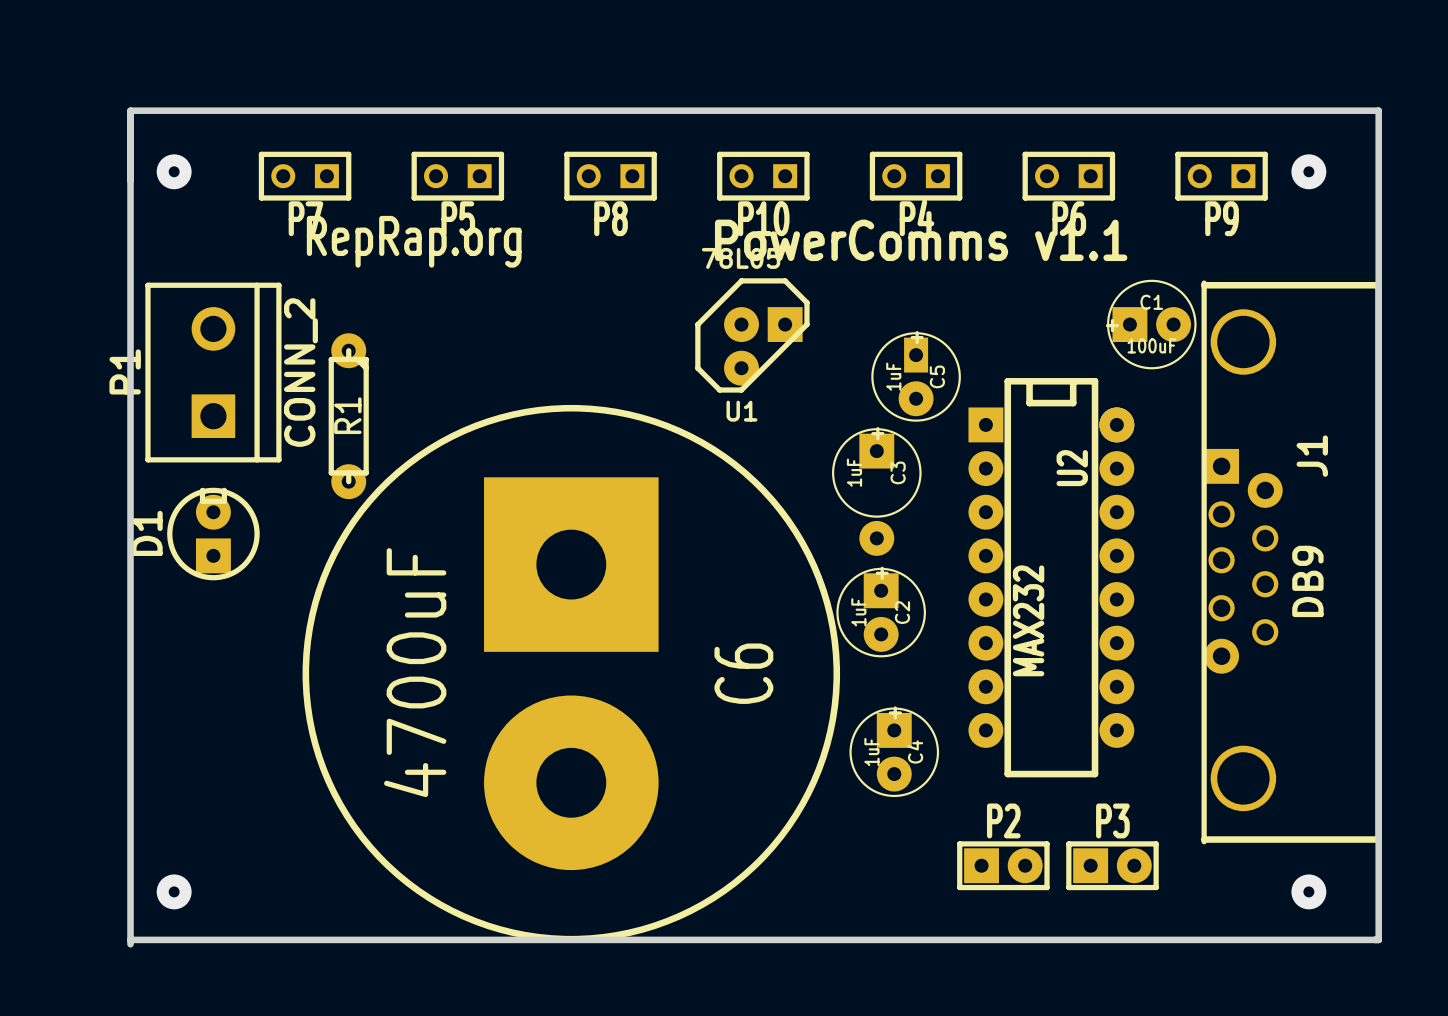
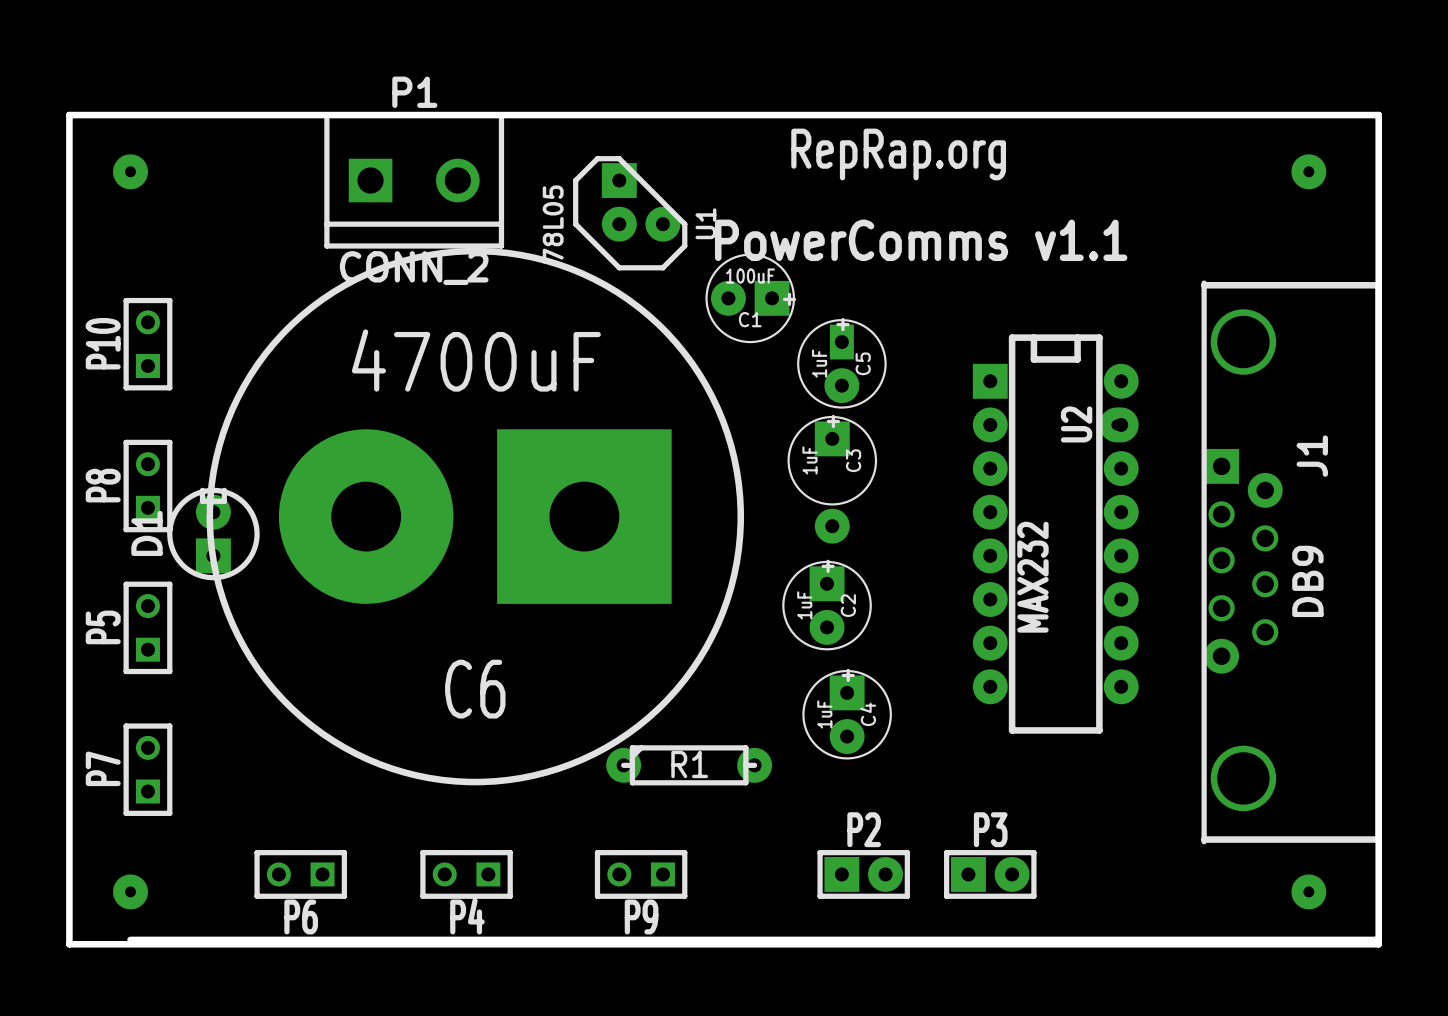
board edge: (1378, 115) (1378, 110) (130, 110) (130, 944) -> (1378, 115) (69, 115) (69, 944) (1378, 944) (1378, 939)
text: none -> RepRap.org (898, 154)
via position: (174, 171) -> (130, 171)
P7 rotation: 0° (305, 176) -> 90° clockwise (147, 769)
P7 position: (305, 176) -> (147, 769)
P5 rotation: 0° (457, 176) -> 90° clockwise (147, 627)
P5 position: (457, 176) -> (147, 627)
P8 rotation: 0° (610, 176) -> 90° clockwise (147, 486)
P8 position: (610, 176) -> (147, 486)
P10 rotation: 0° (763, 176) -> 90° clockwise (147, 344)
P10 position: (763, 176) -> (147, 344)
P4 position: (916, 176) -> (466, 874)
P6 position: (1068, 176) -> (300, 874)
P9 position: (1221, 176) -> (641, 874)
text: RepRap.org (414, 241) -> none
C1 rotation: 0° (1151, 324) -> 180° (750, 298)
C1 position: (1151, 324) -> (750, 298)
U1 rotation: 0° (752, 335) -> 90° counterclockwise (630, 213)
U1 position: (752, 335) -> (630, 213)
P1 rotation: 0° (213, 372) -> 90° clockwise (414, 180)
P1 position: (213, 372) -> (414, 180)
C5 position: (916, 376) -> (841, 363)
R1 rotation: 0° (348, 416) -> 90° counterclockwise (689, 765)
R1 position: (348, 416) -> (689, 765)
C3 position: (876, 492) -> (832, 479)
U2 position: (1051, 577) -> (1055, 534)
C2 position: (881, 612) -> (827, 605)
C6 rotation: 0° (571, 673) -> 90° clockwise (475, 516)
C4 position: (894, 752) -> (847, 714)
P2 position: (1003, 865) -> (863, 874)
P3 position: (1112, 865) -> (990, 874)
via position: (174, 891) -> (130, 891)

